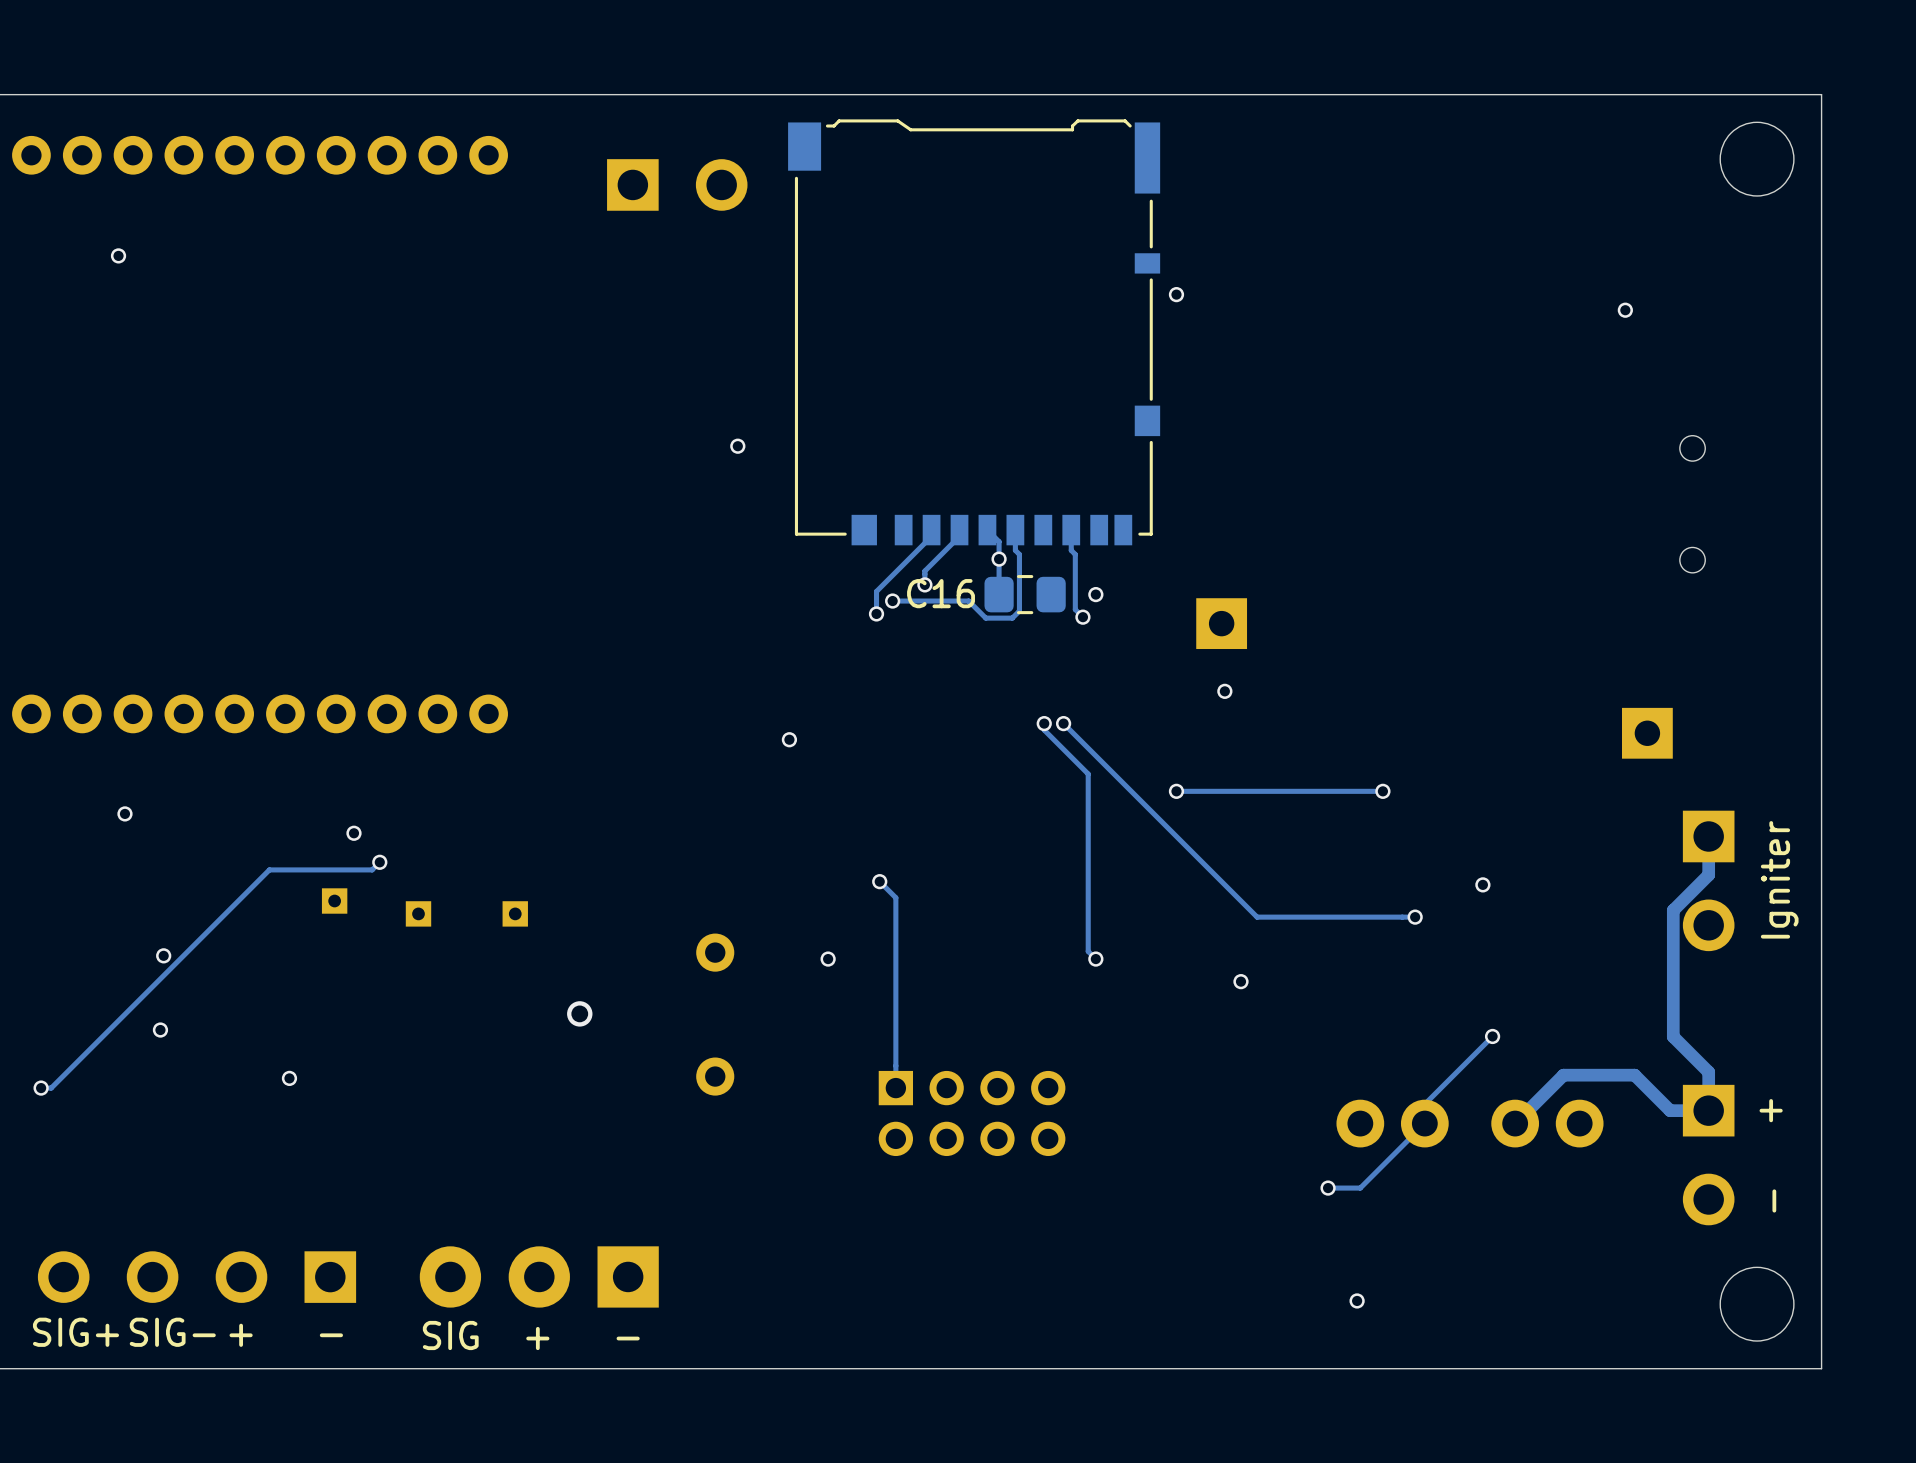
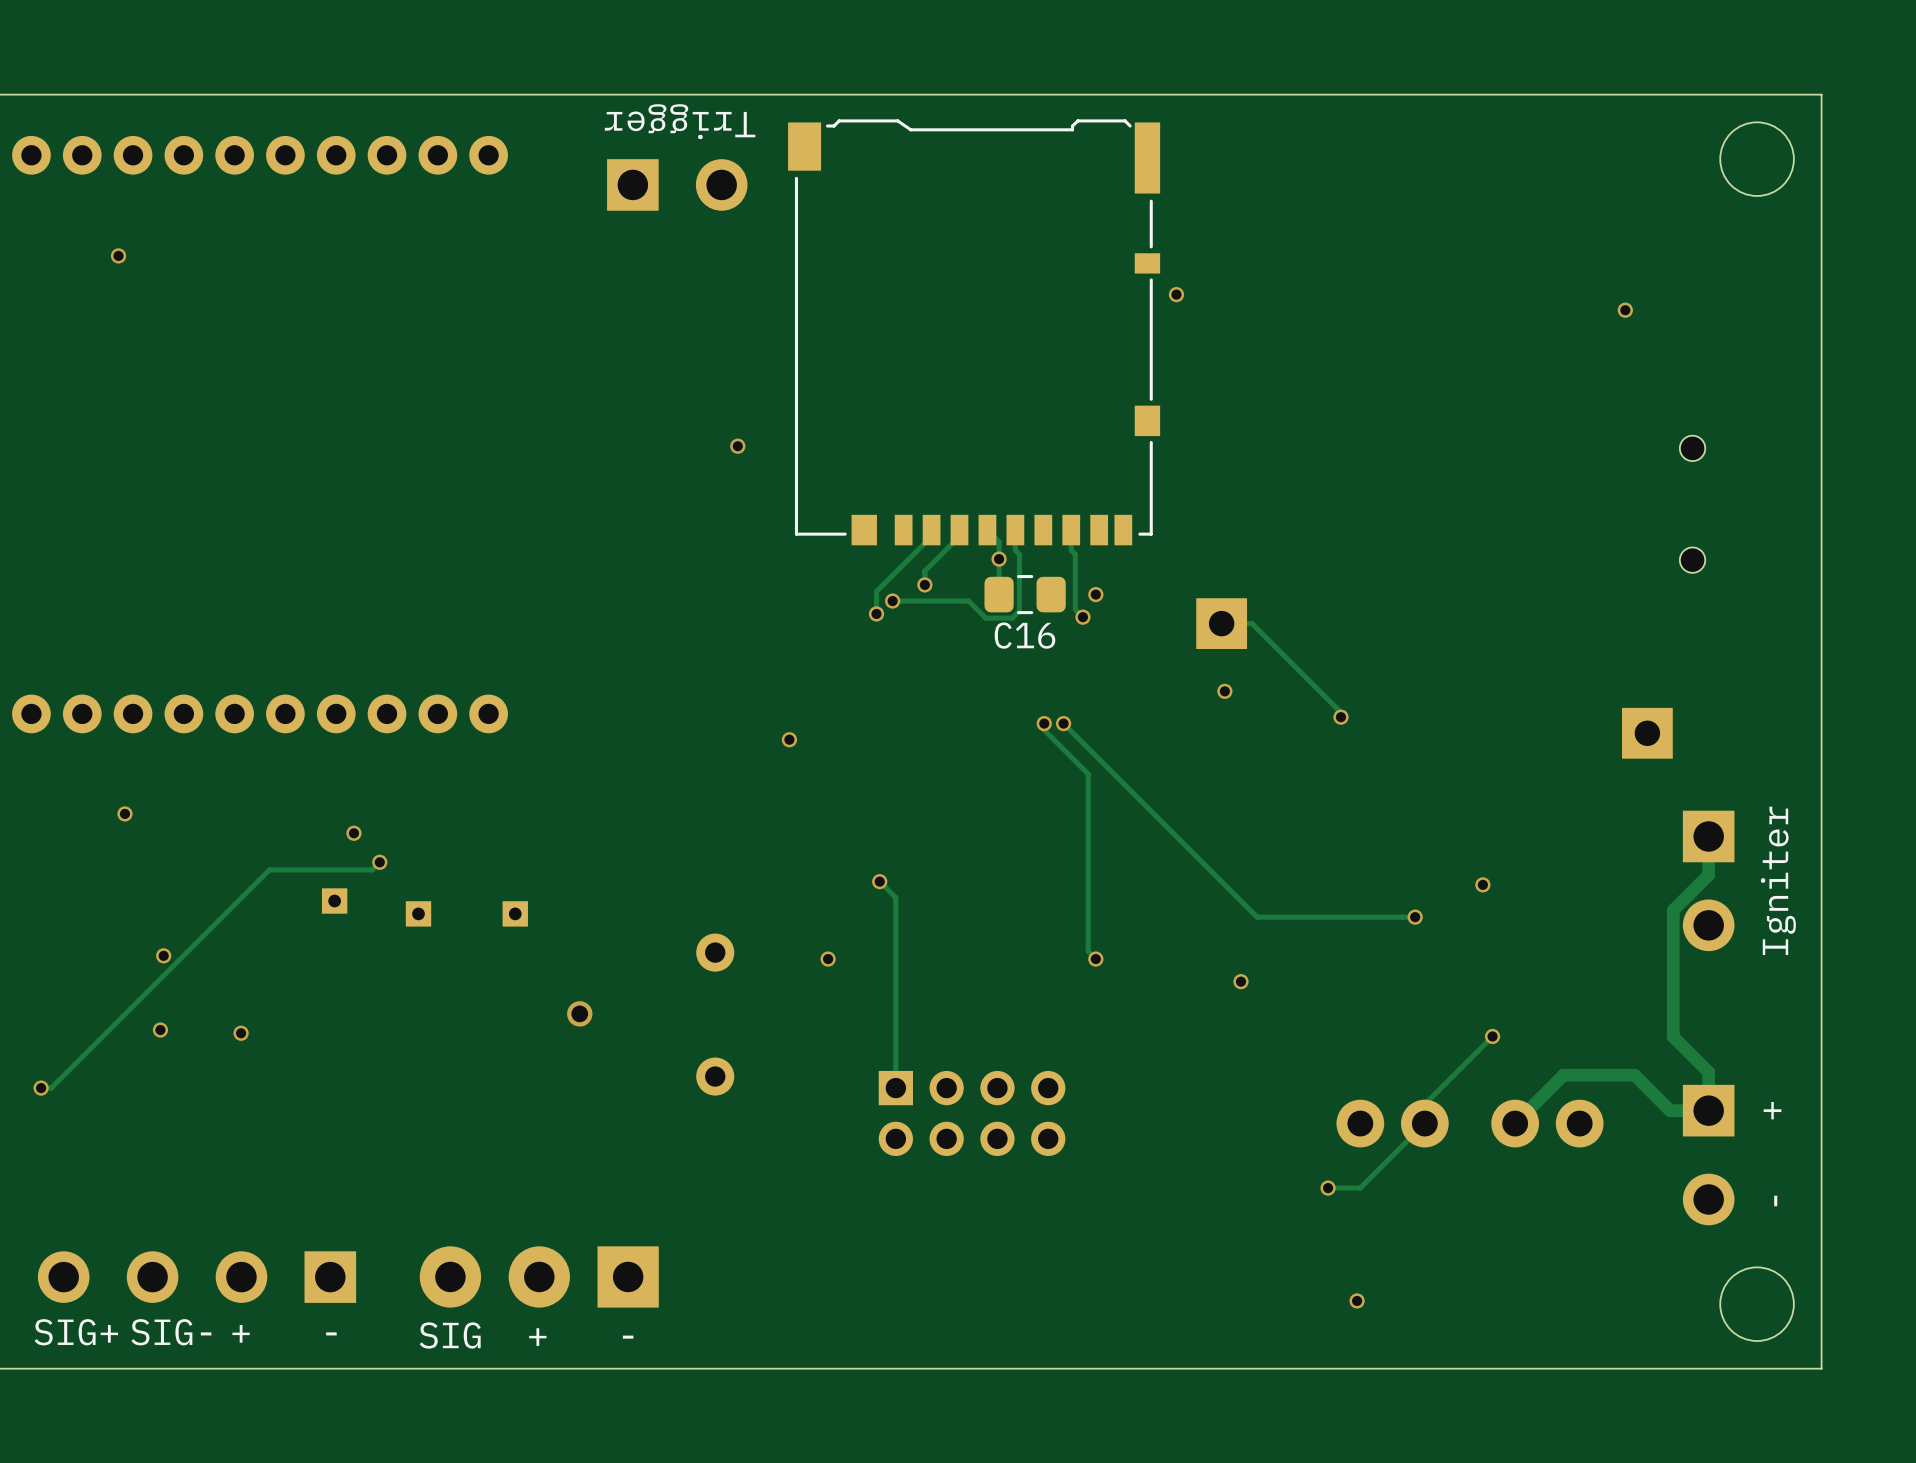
text: none -> Trigger (680, 121)
C16 name position: C16 (941, 593) -> C16 (1024, 635)
track: none -> (1221, 623) (1252, 623) (1340, 712) (1340, 717)
via: (1176, 791) -> none
track: (1382, 791) (1176, 791) -> none
via position: (1382, 791) -> (1340, 717)
via position: (289, 1078) -> (241, 1033)

